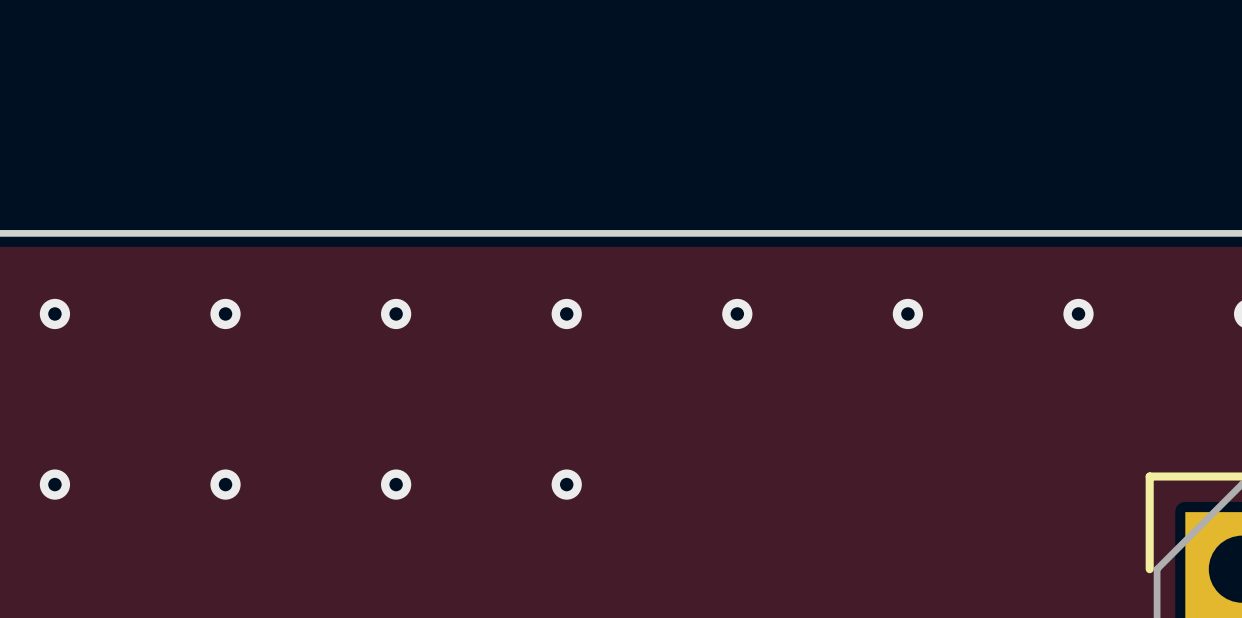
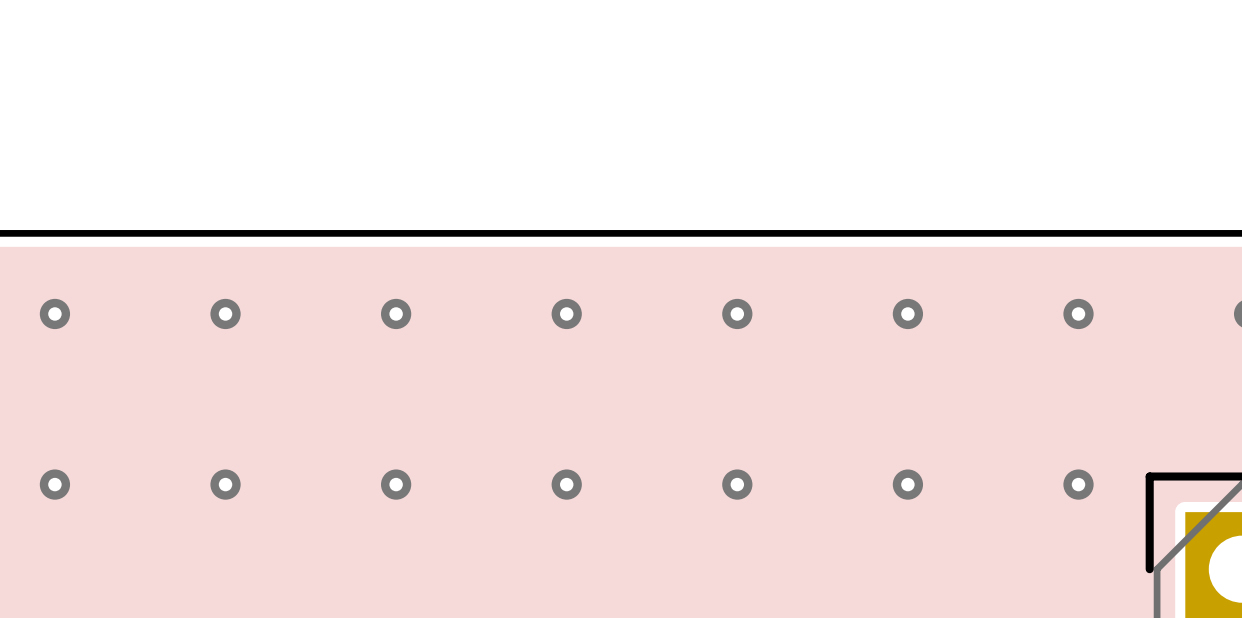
via: none -> (737, 484)
via: none -> (907, 484)
via: none -> (1078, 484)

